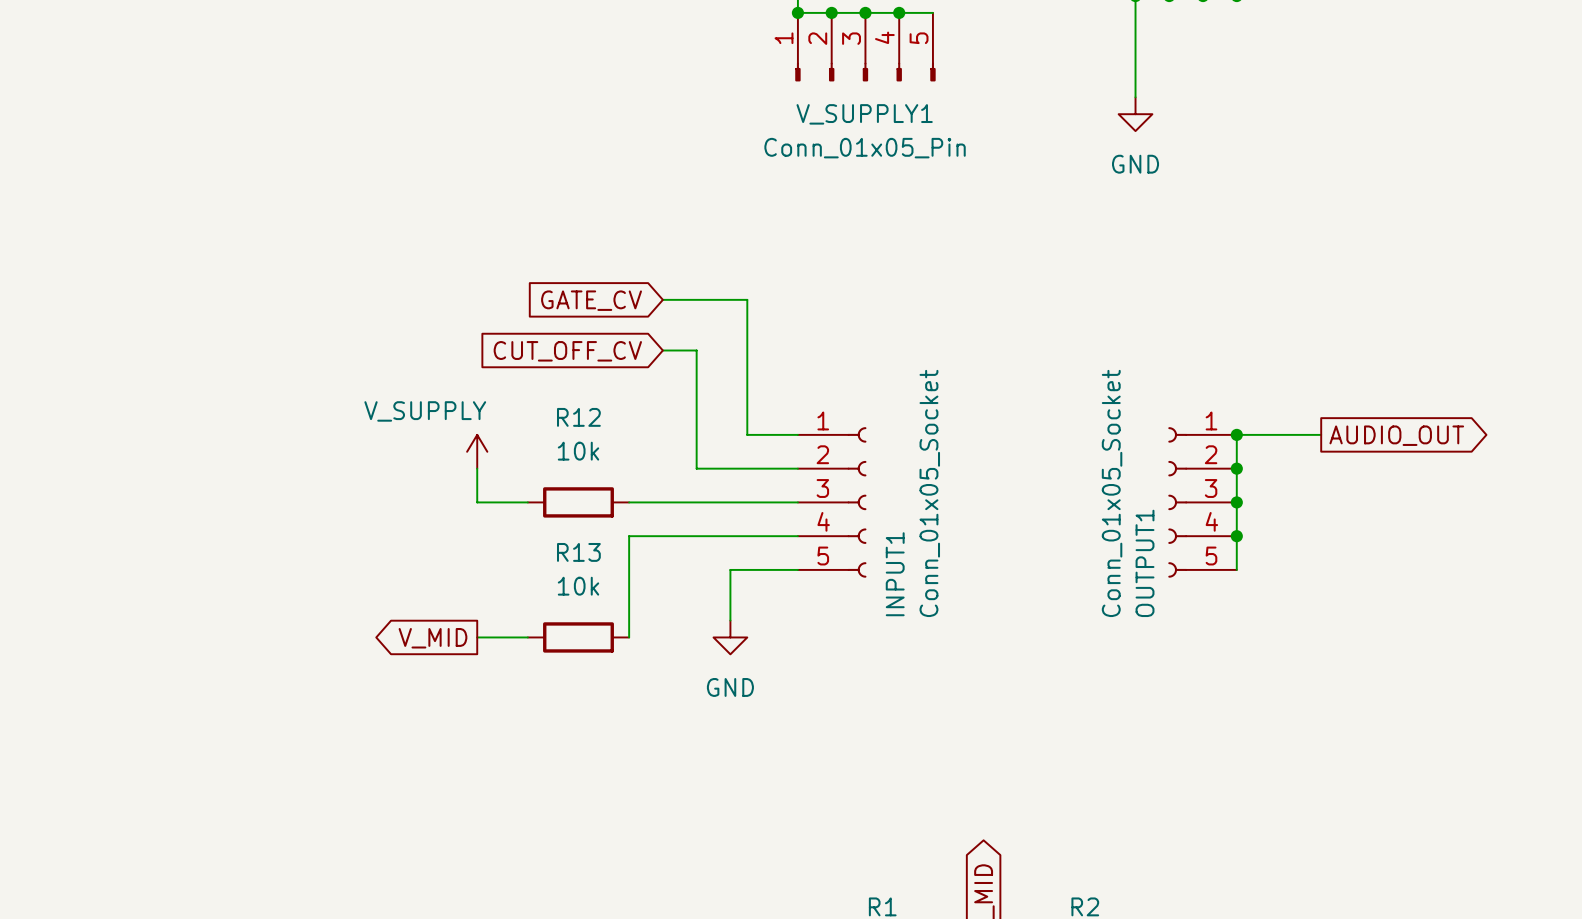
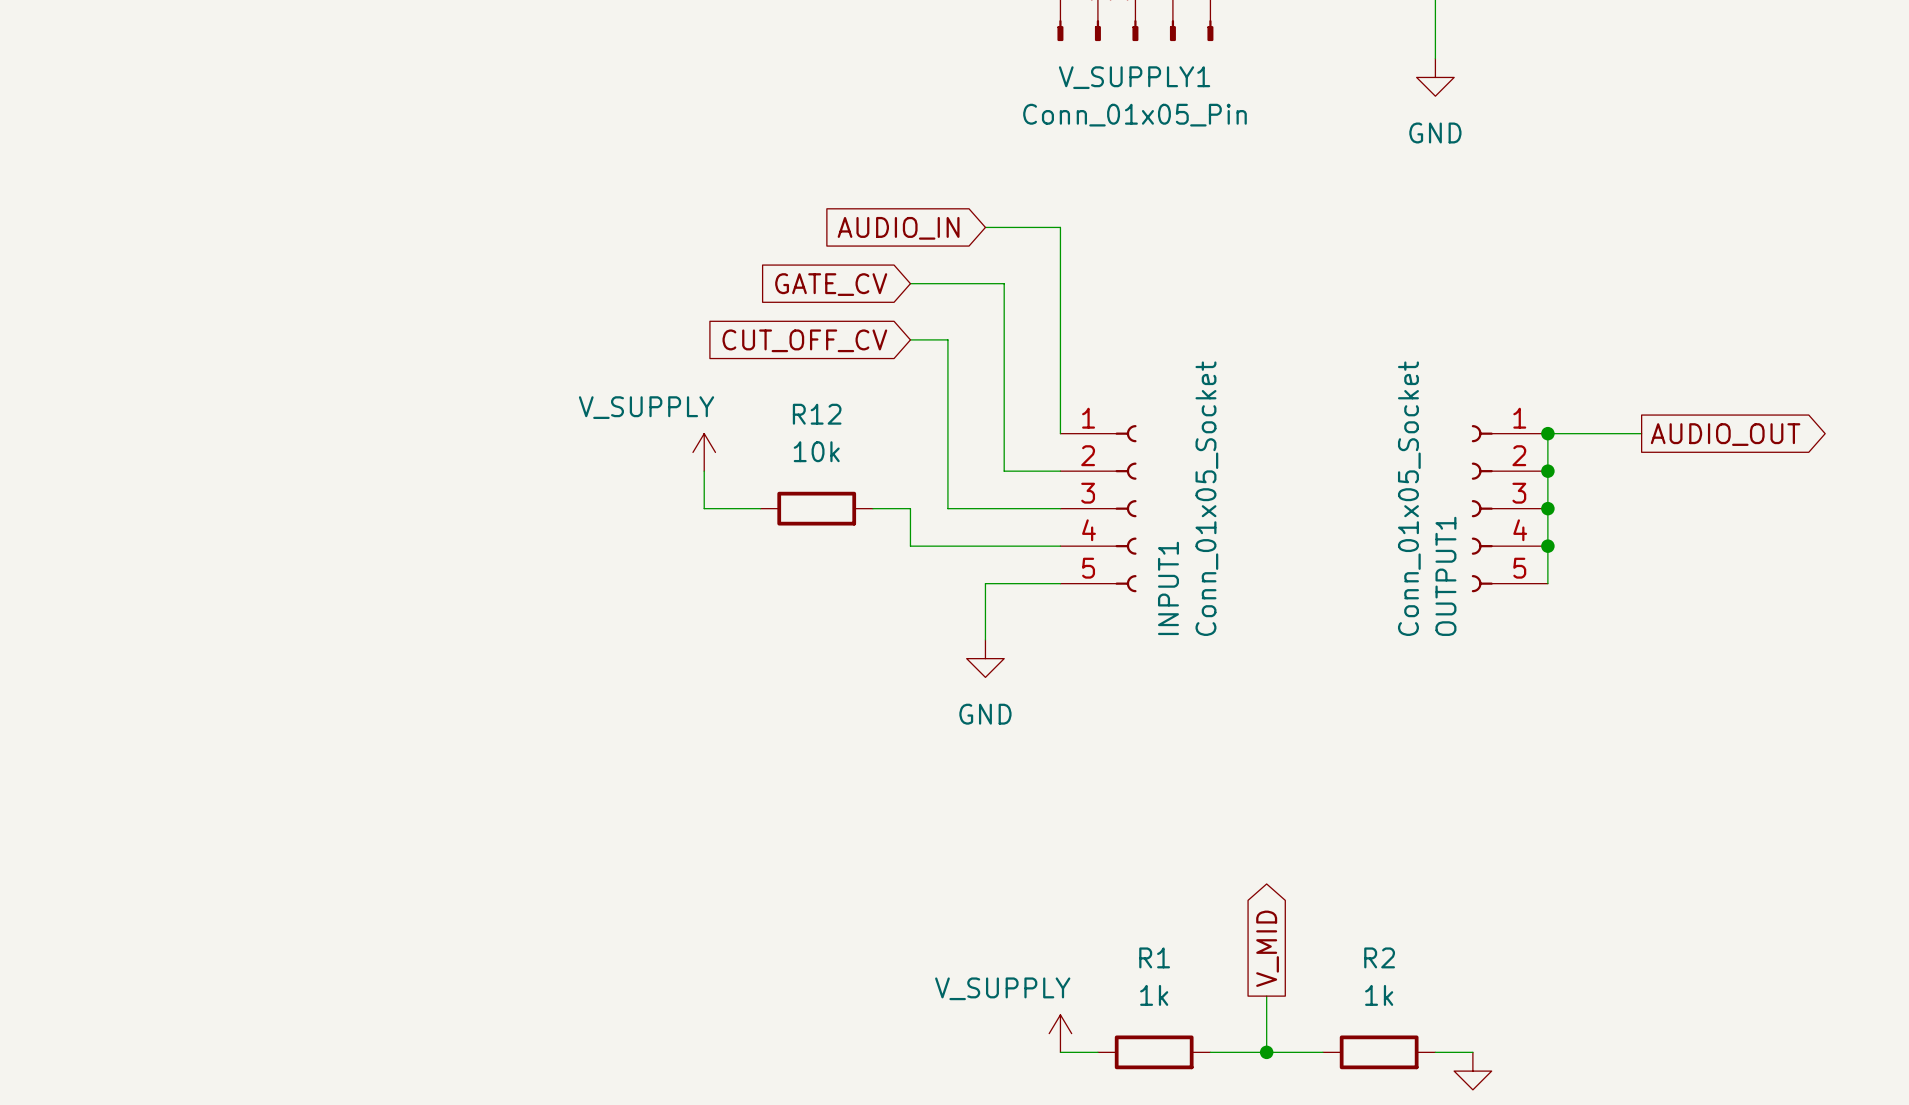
wire: none -> (985, 227) (1060, 227) (1060, 433)
global label: none -> AUDIO_IN (898, 228)
wire: (747, 434) (797, 434) -> (1004, 433) (1004, 471)
wire: (696, 468) (747, 468) -> (947, 471) (947, 508)
wire: (662, 502) (696, 502) -> (910, 508) (910, 546)
wire: (662, 536) (629, 536) (629, 637) -> none
wire: (477, 637) (527, 637) -> none
R13: 10k (578, 637) -> none
global label: V_MID (432, 638) -> none

